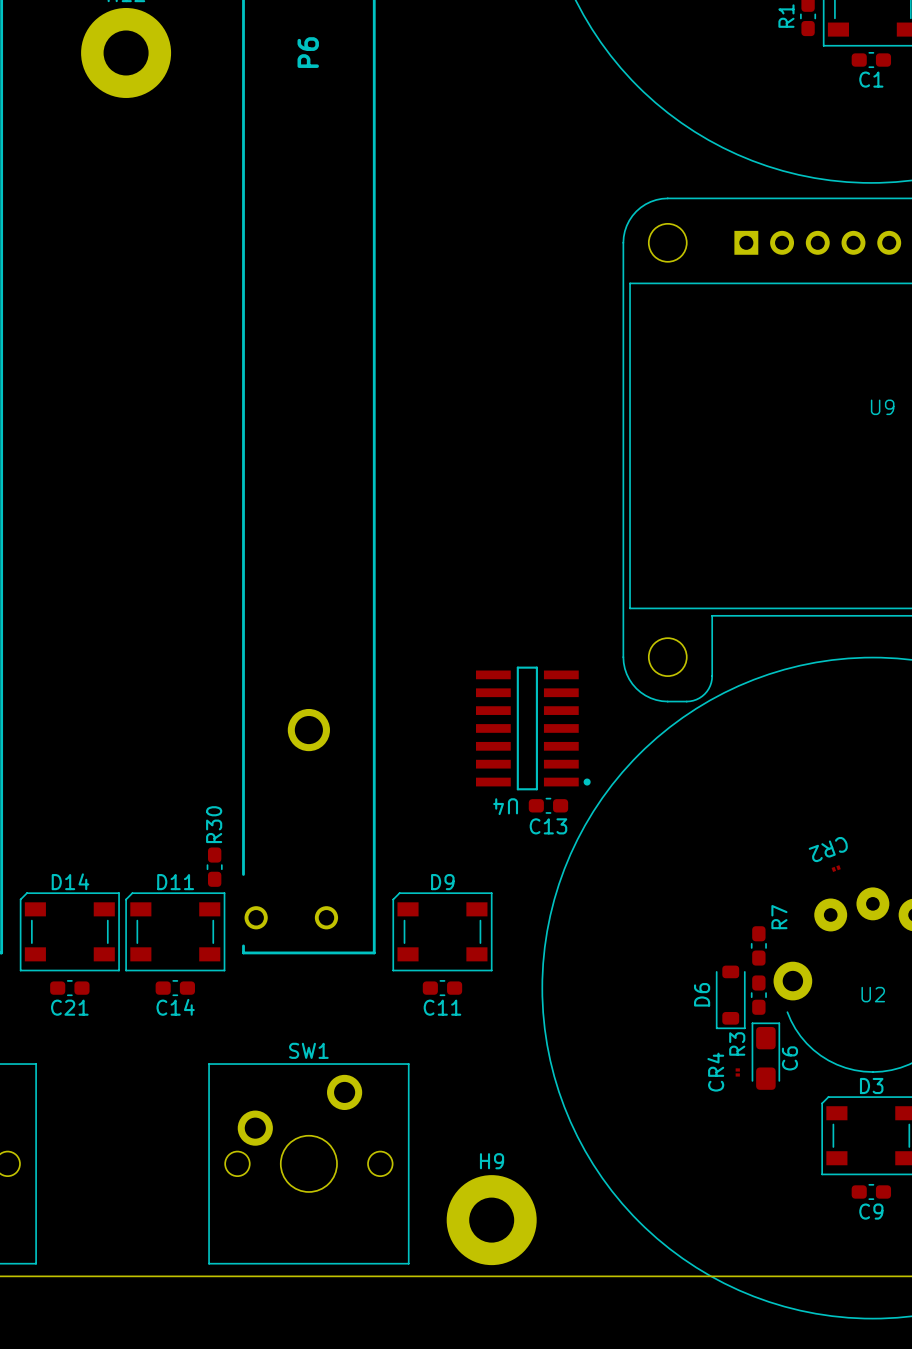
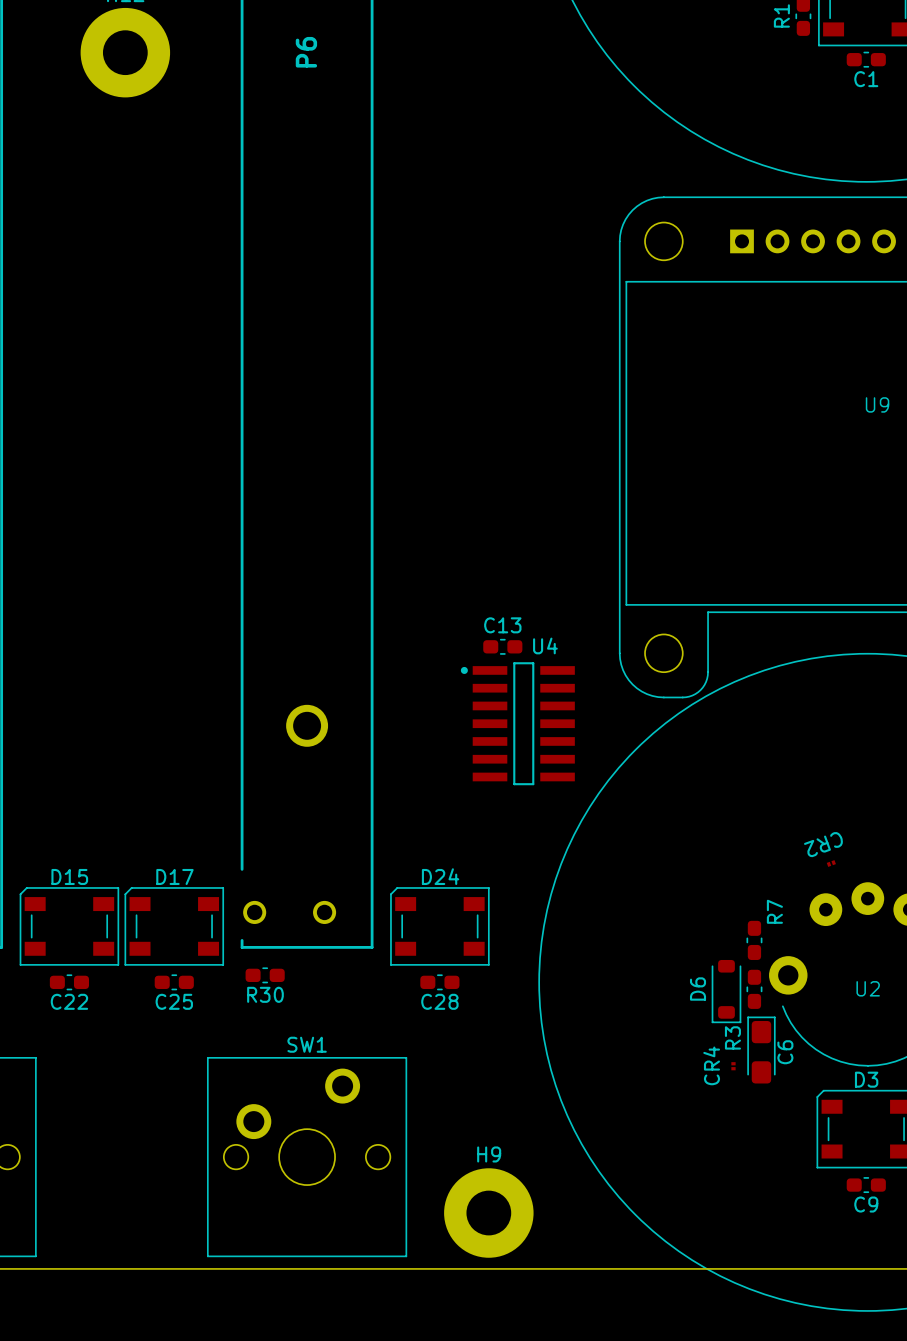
U4 rotation: 0° (533, 728) -> 180° (517, 723)
C13 position: (548, 805) -> (502, 646)
R30 name position: R30 (214, 824) -> R30 (265, 994)
C13 name position: C13 (548, 826) -> C13 (502, 625)
R30 rotation: 0° (214, 867) -> 90° clockwise (265, 975)
R30 position: (214, 867) -> (265, 975)
D14 name: D14 (70, 881) -> D15 (69, 876)
D11 name: D11 (175, 882) -> D17 (174, 876)
D9 name: D9 (442, 882) -> D24 (440, 876)
C21 name: C21 (69, 1007) -> C22 (69, 1001)
C14 name: C14 (175, 1007) -> C25 (174, 1001)
C11 name: C11 (442, 1007) -> C28 (439, 1001)

